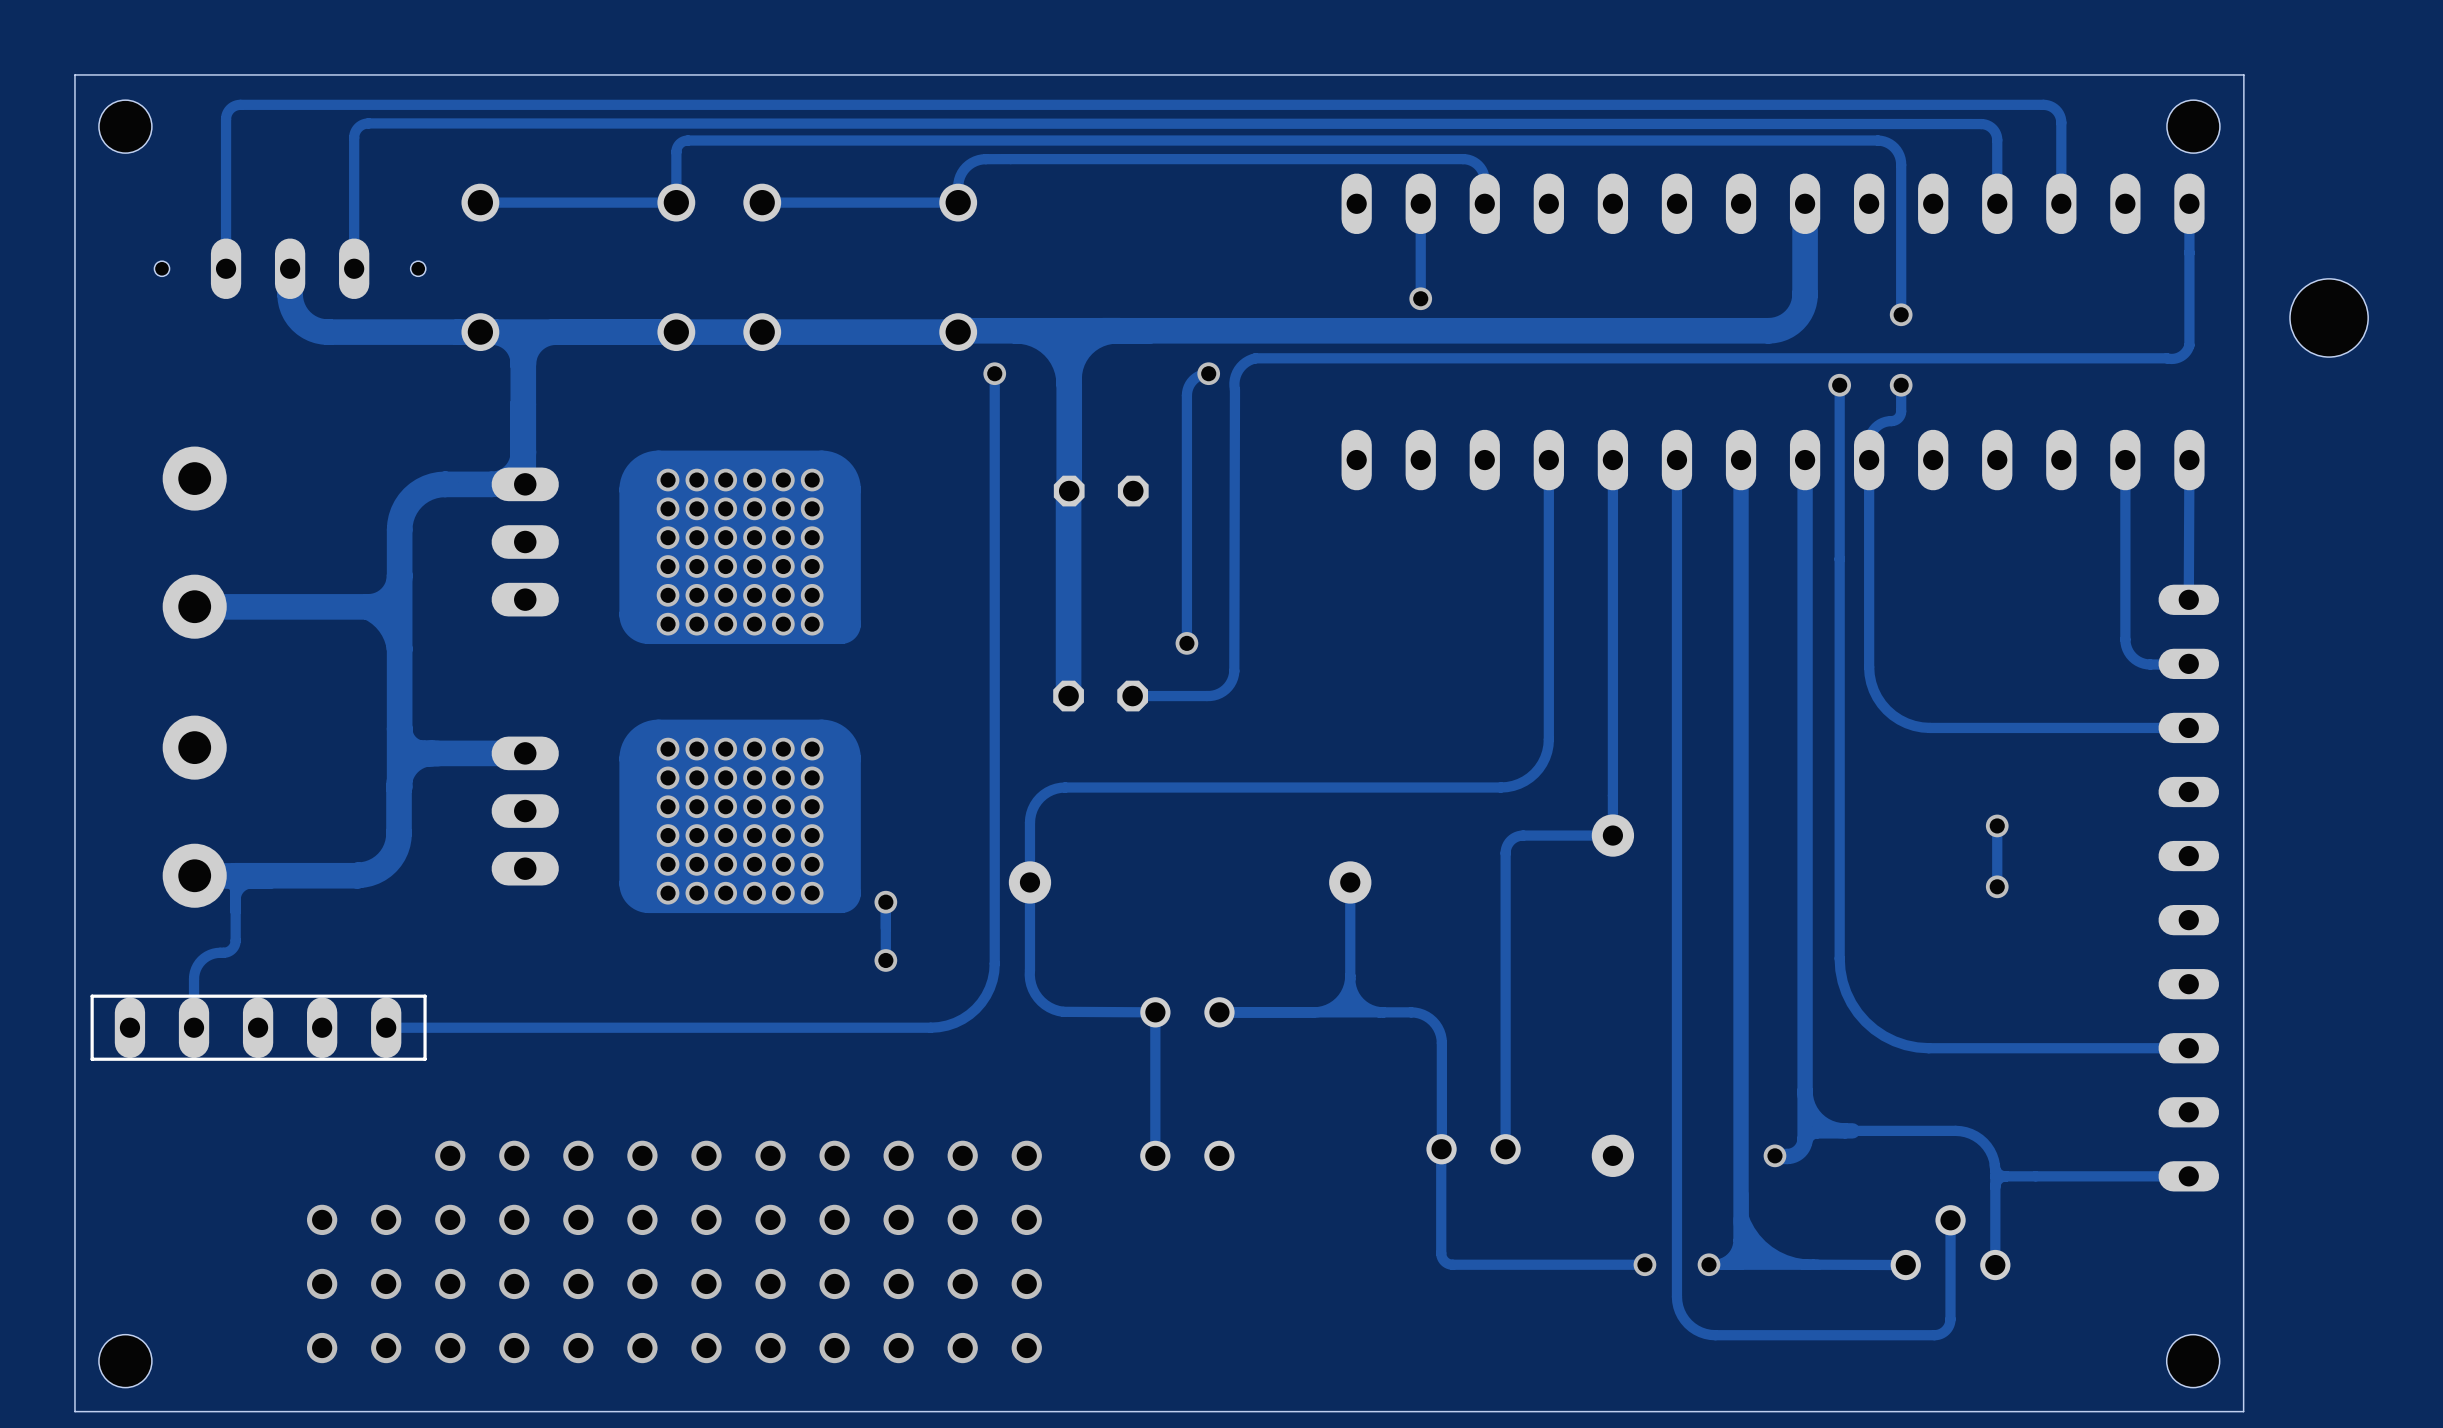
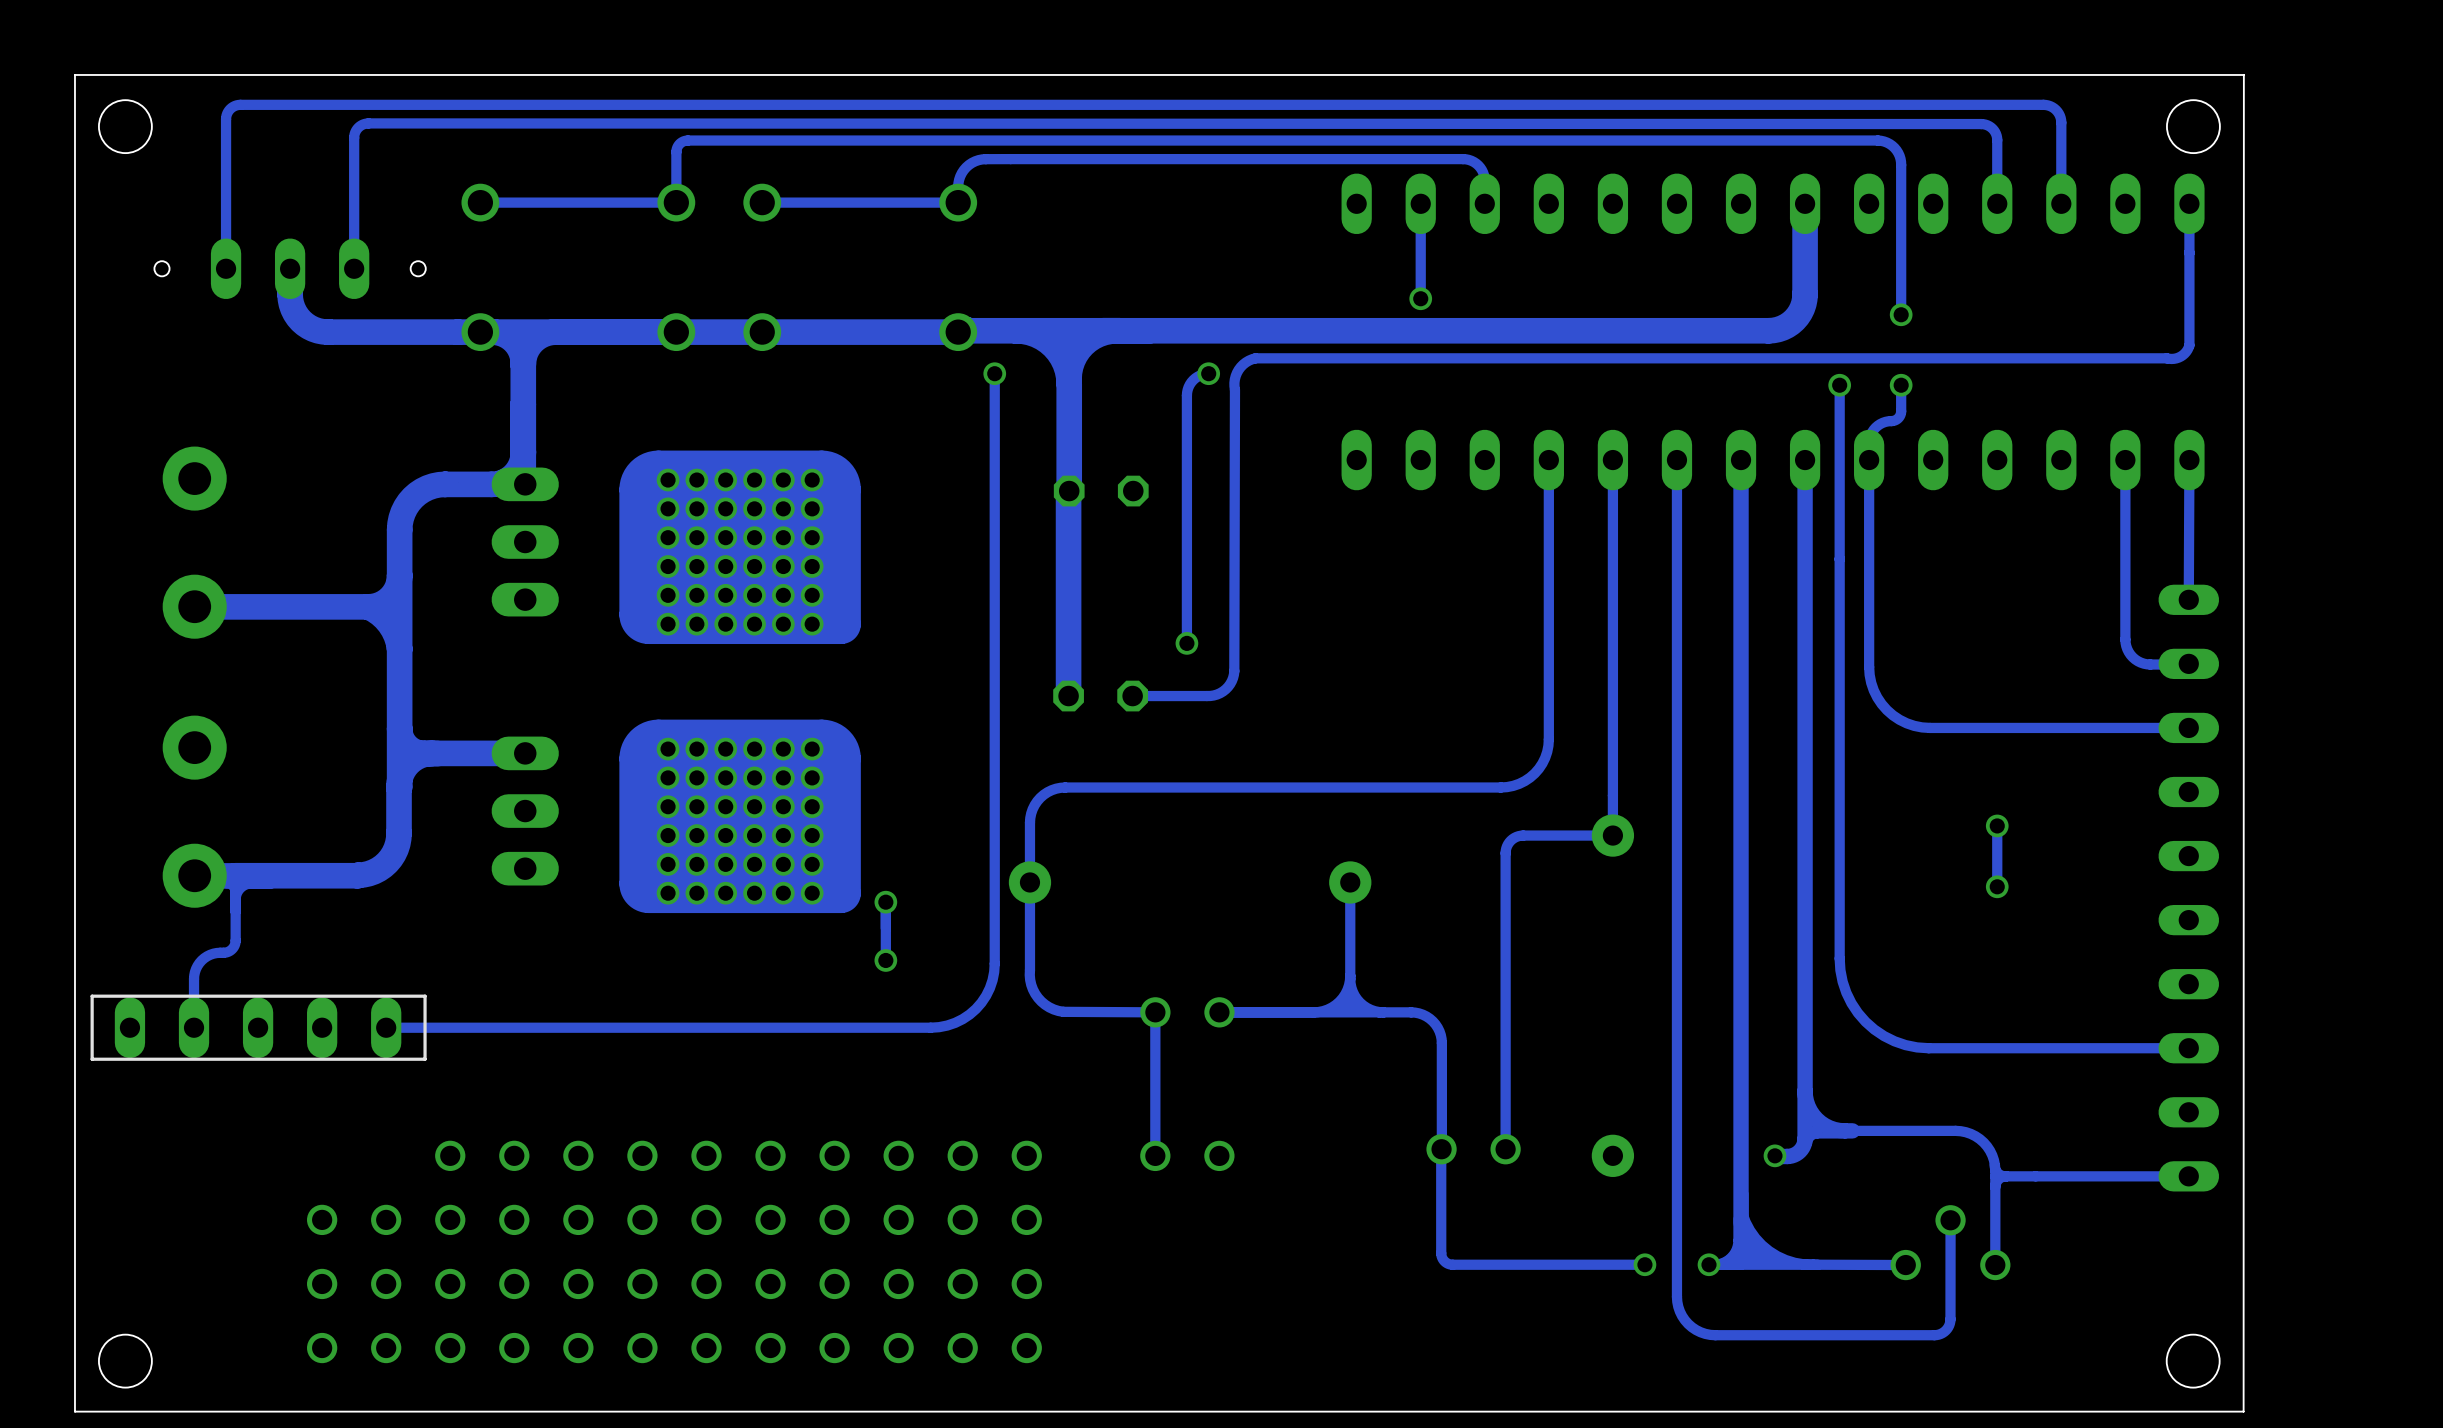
hole: (2329, 317) -> none

